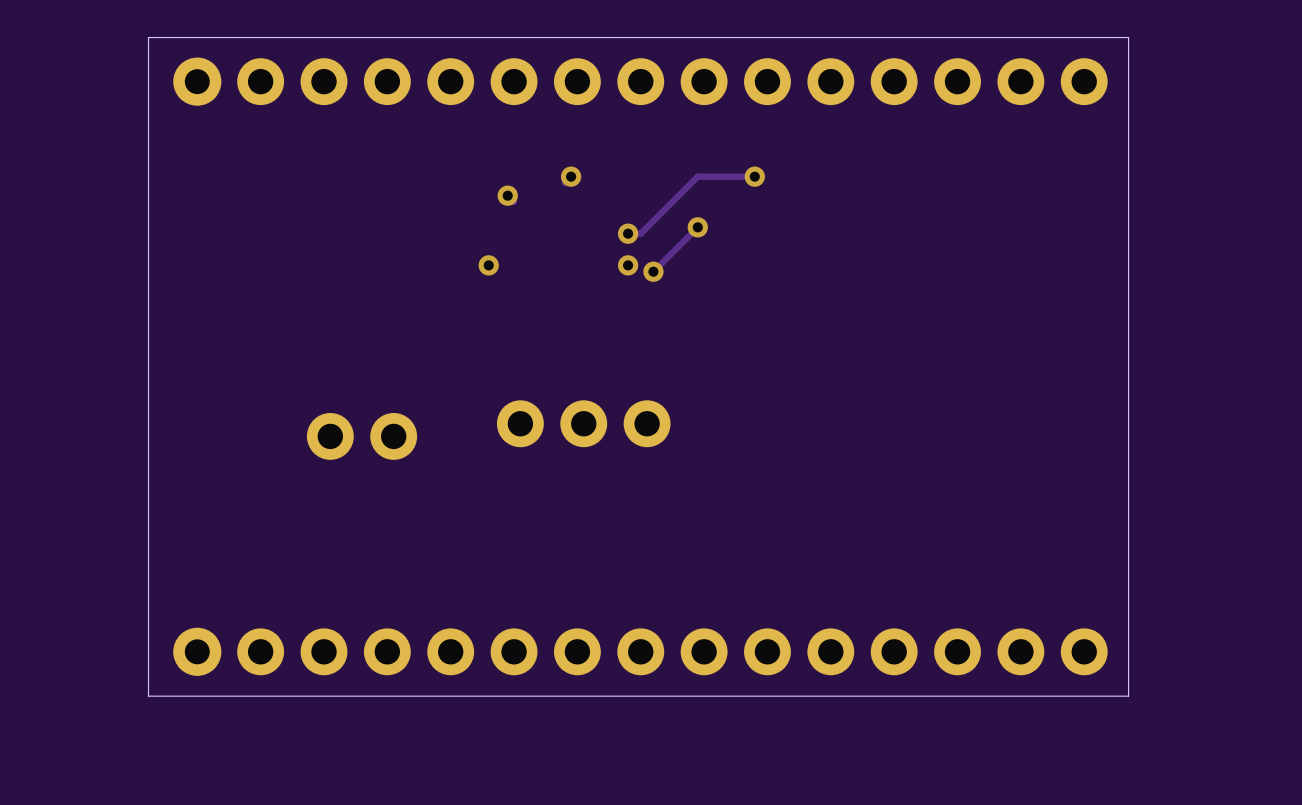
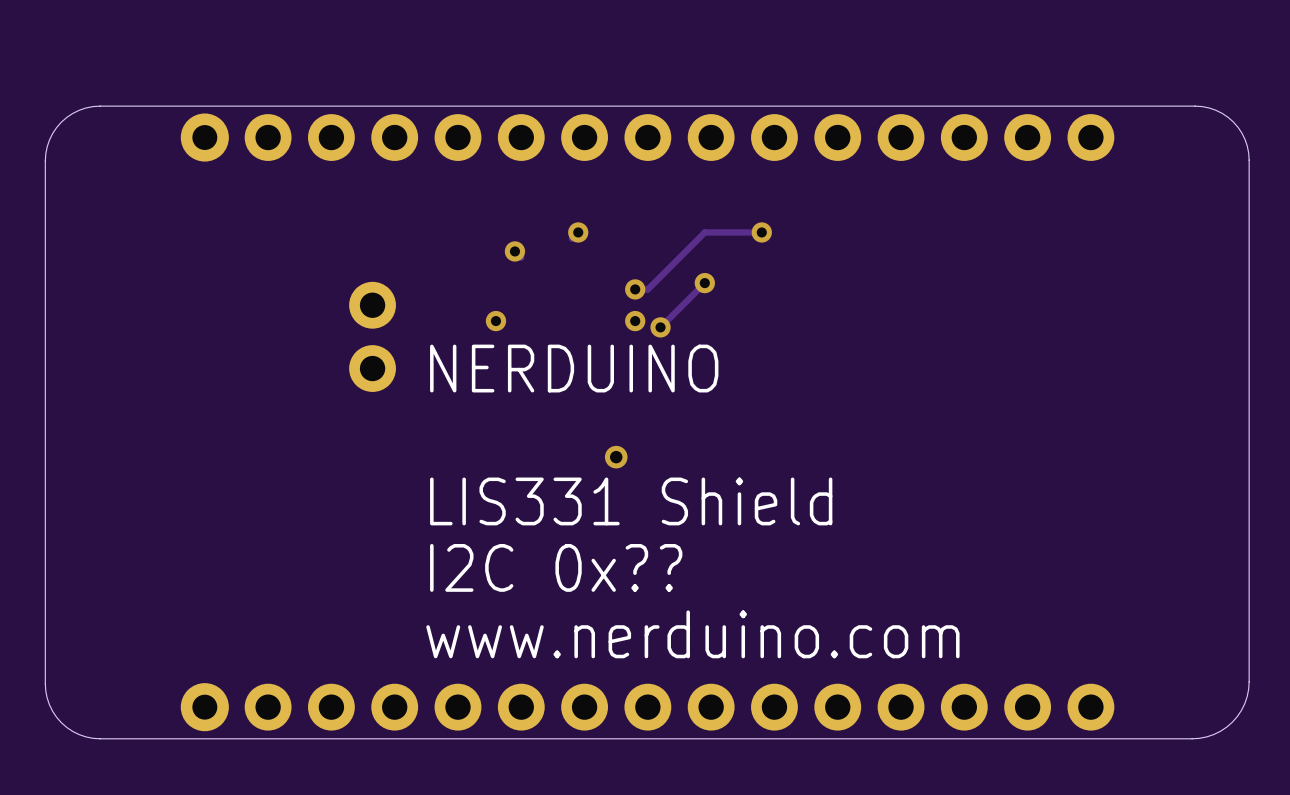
board edge: (1128, 37) (148, 37) (148, 696) (1128, 696) (1128, 37) -> (1195, 106) (1215, 110) (1233, 121) (1245, 139) (1249, 160) (1249, 681) (1247, 696) (1241, 710) (1232, 722) (1220, 731) (1206, 736) (1192, 738) (100, 738) (85, 736) (72, 731) (61, 722) (52, 711) (47, 698) (45, 683) (45, 160) (47, 146) (52, 133) (61, 122) (72, 113) (85, 107) (100, 106) (1195, 106)
text: none -> NERDUINO (574, 368)
via: none -> (616, 457)
part: (583, 423) -> none
part rotation: 0° (362, 436) -> 90° clockwise (372, 336)
part position: (362, 436) -> (372, 336)
text: none -> LIS331 Shield (631, 501)
text: none -> I2C 0x?? (556, 567)
text: none -> www.nerduino.com (692, 634)

